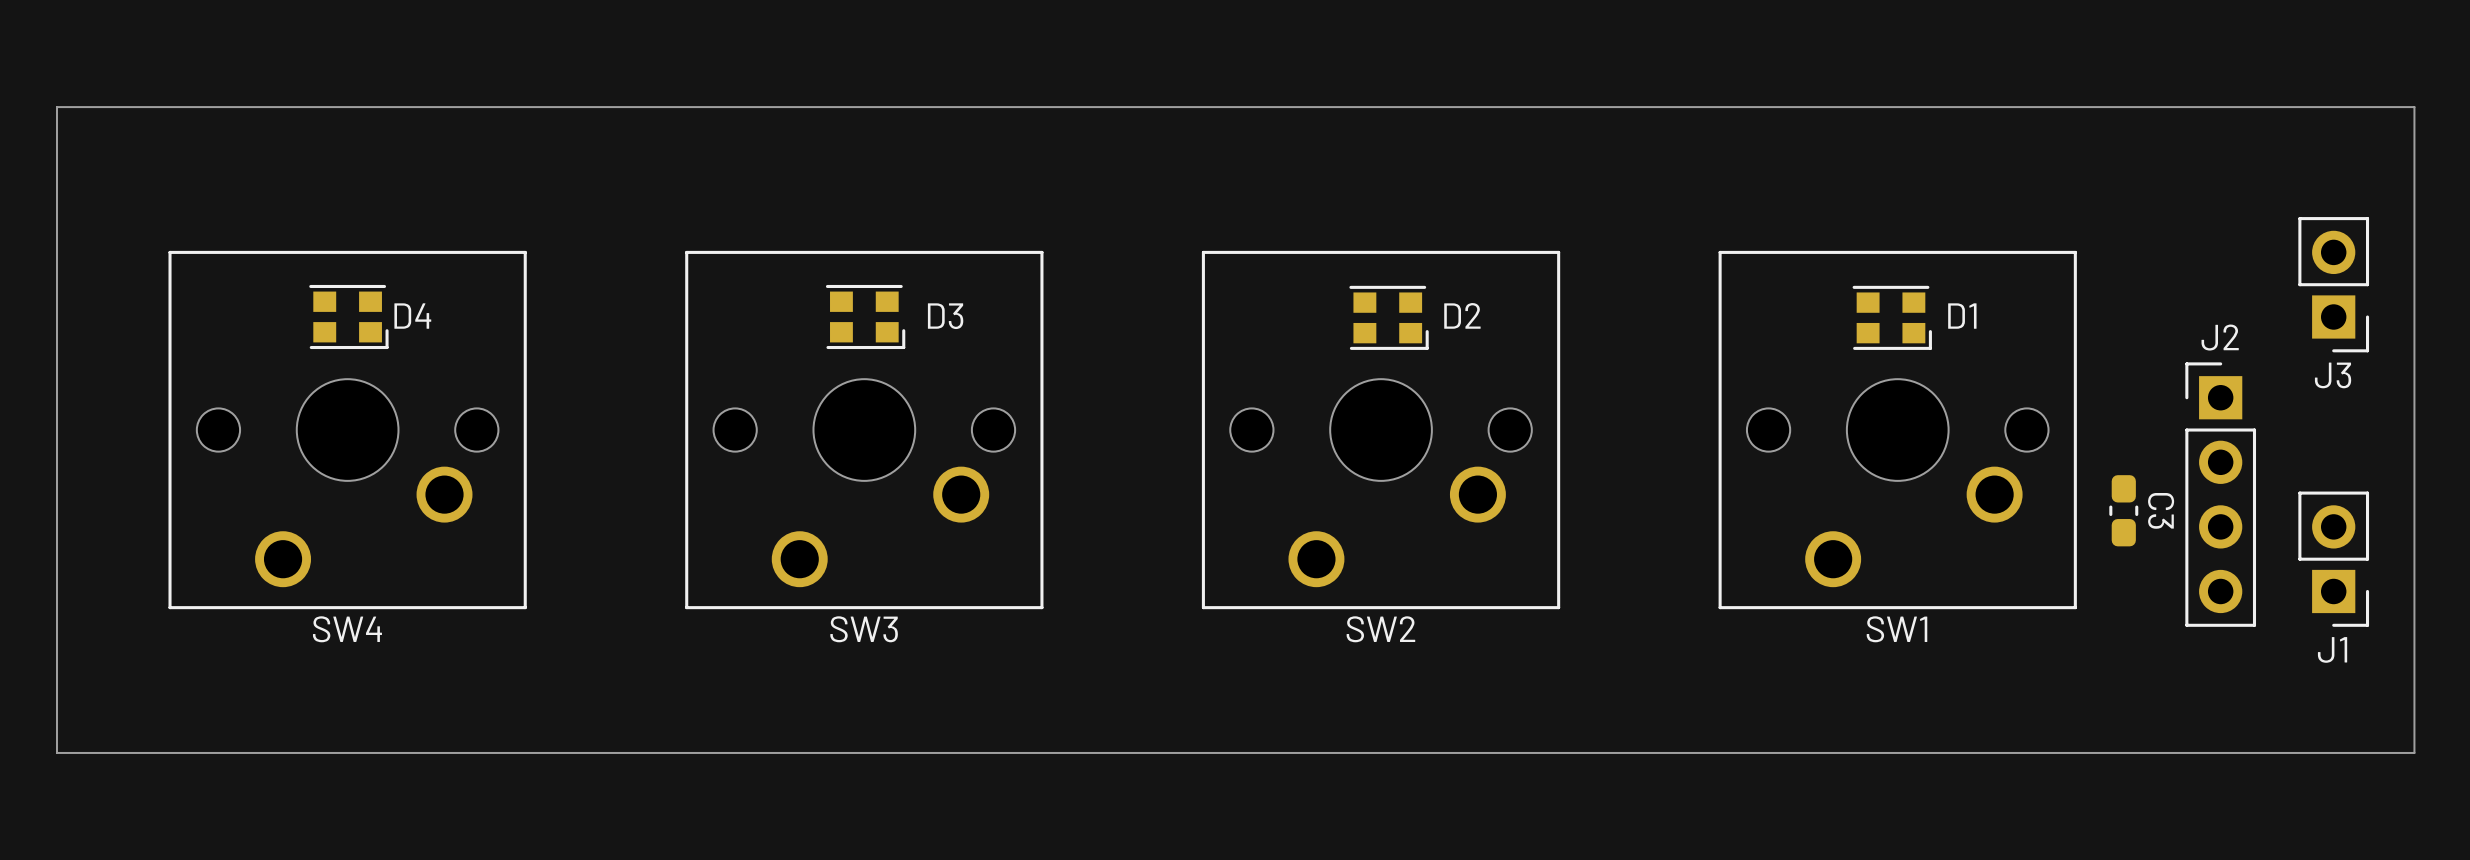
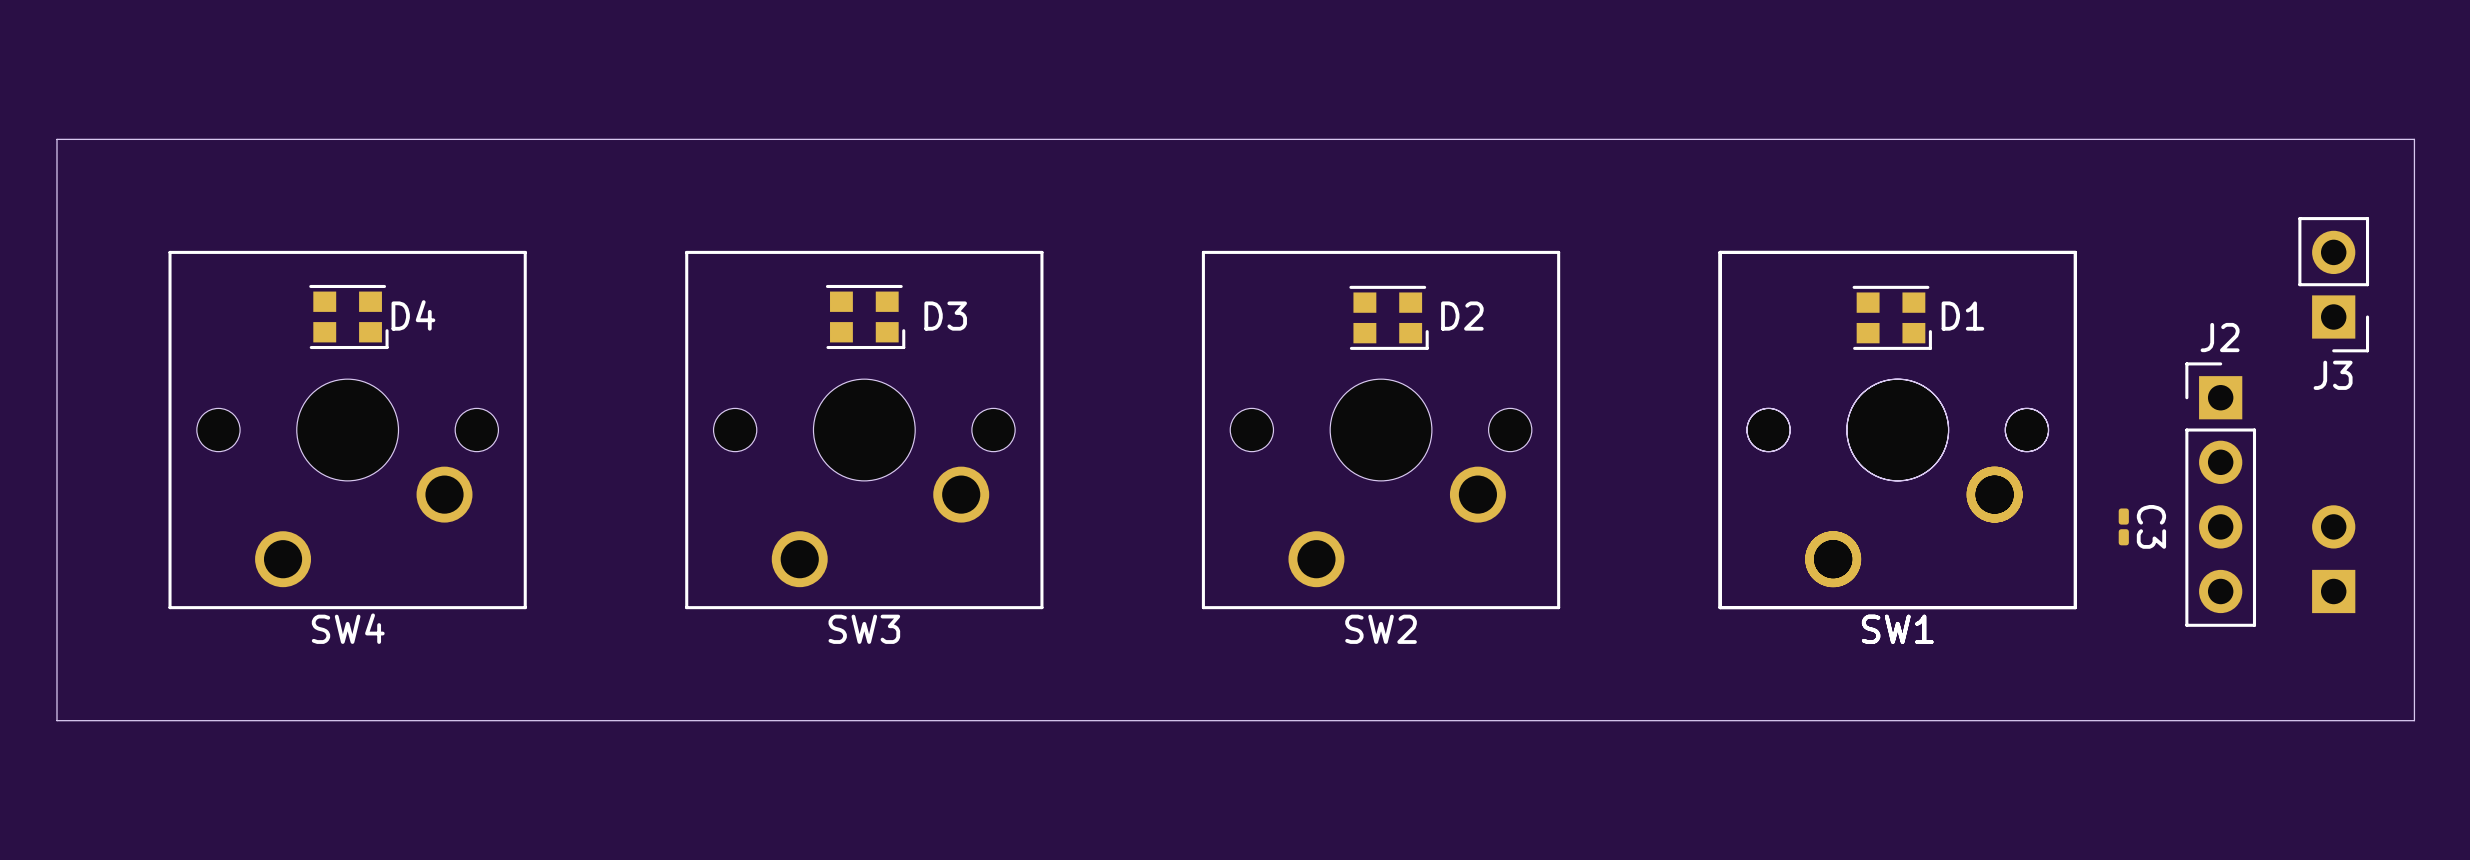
board edge: (2414, 139) (2414, 107) (56, 107) (56, 139) -> (2414, 139) (56, 139)
SW1: none -> (1897, 430)
C3 footprint: [2109, 475, 2139, 547] -> [2118, 508, 2129, 546]
J1 side: bottom (2333, 559) -> top (2333, 559)
board edge: (2414, 720) (2414, 752) (56, 752) (56, 720) -> (2414, 720) (56, 720)

